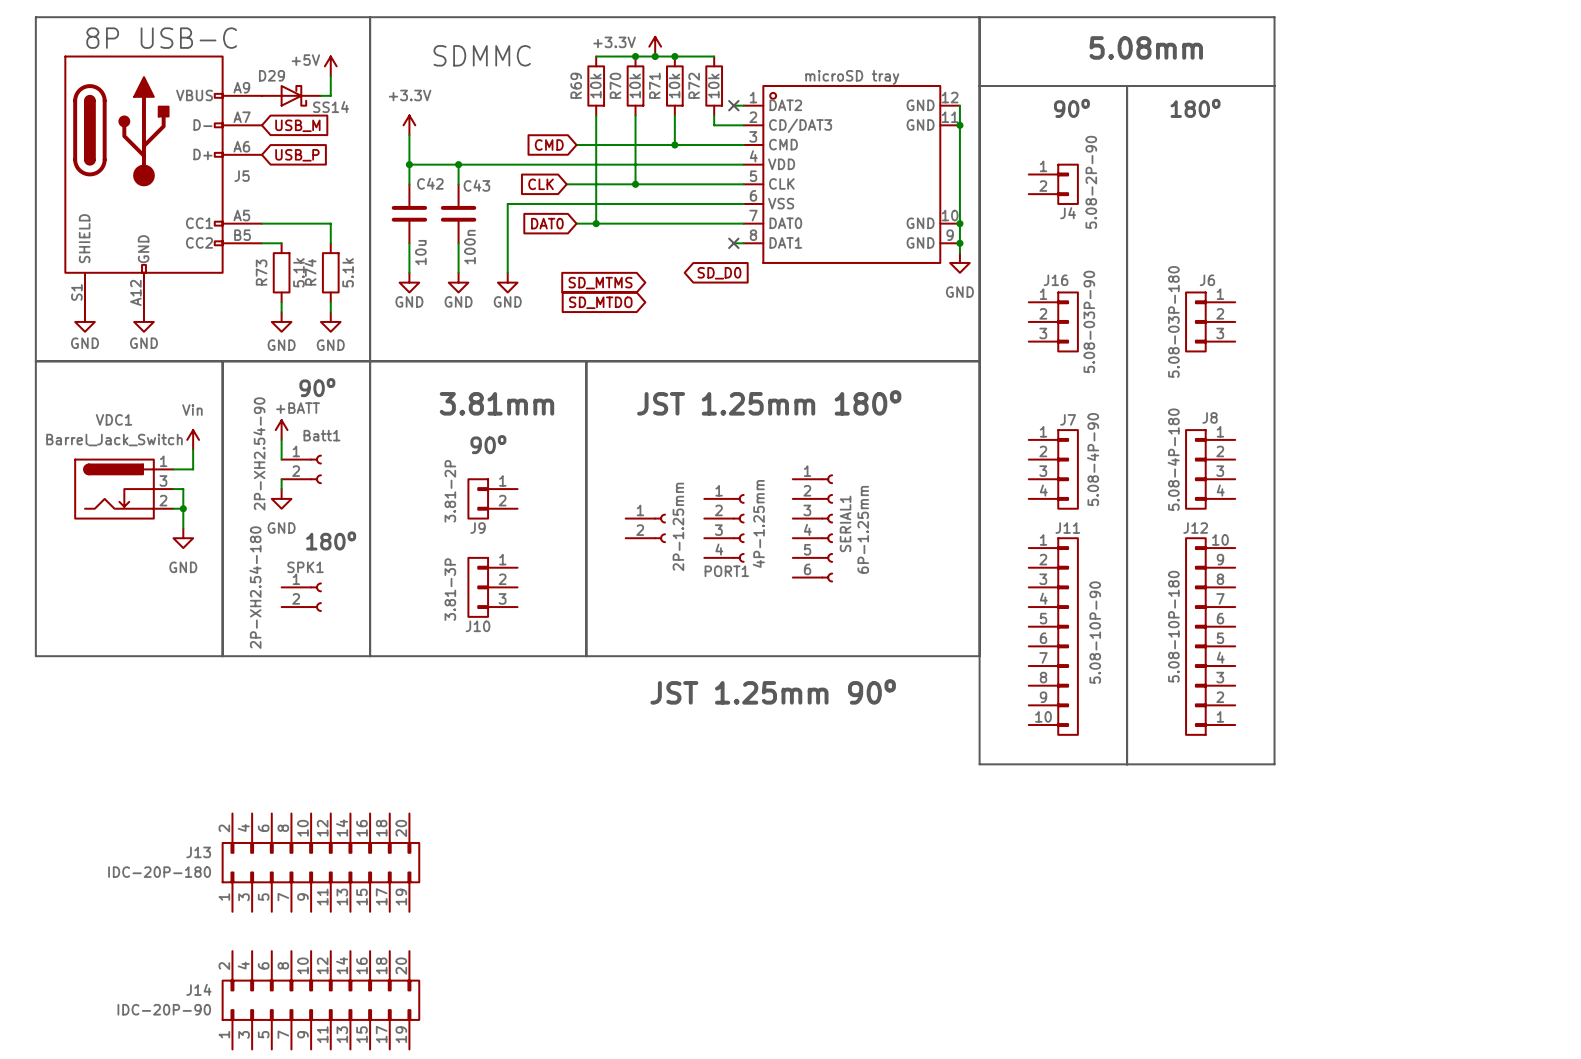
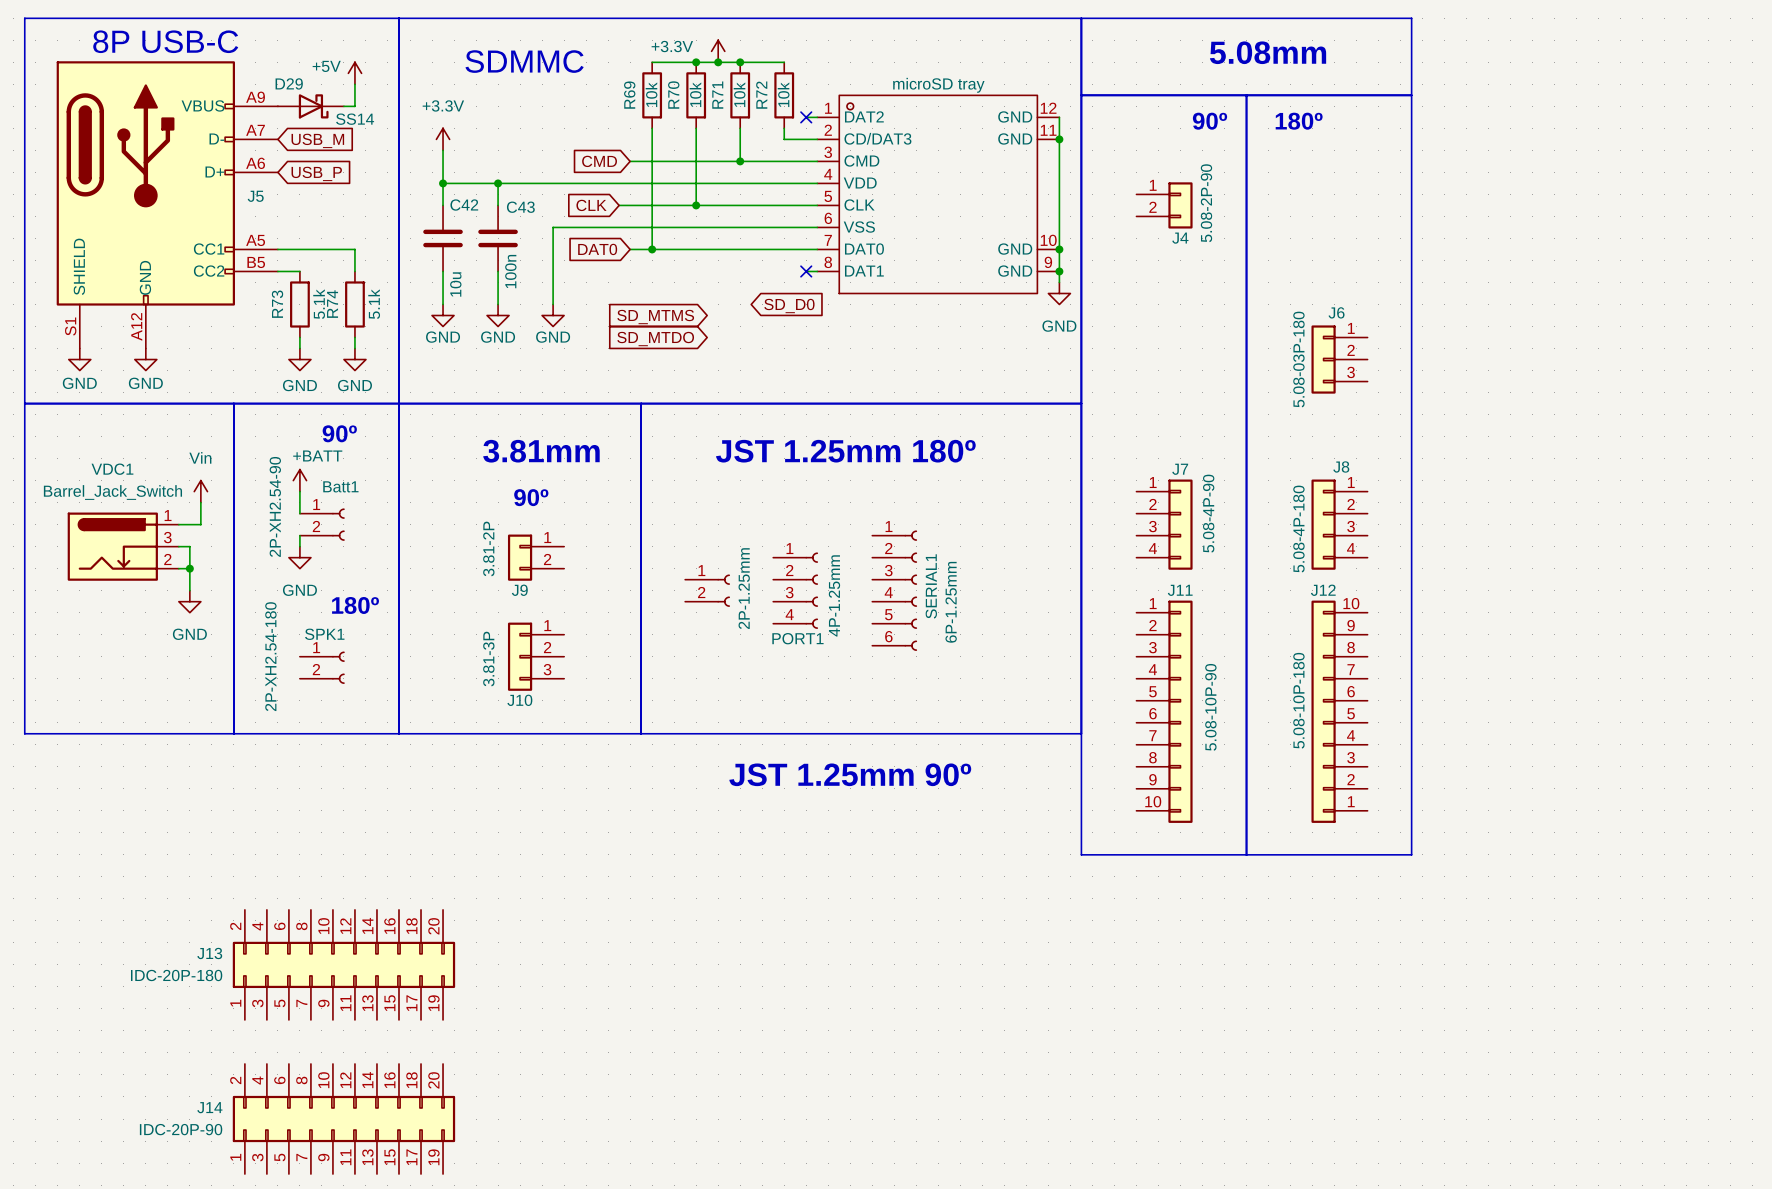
J16: 5.08-03P-90 (1053, 321) -> none

